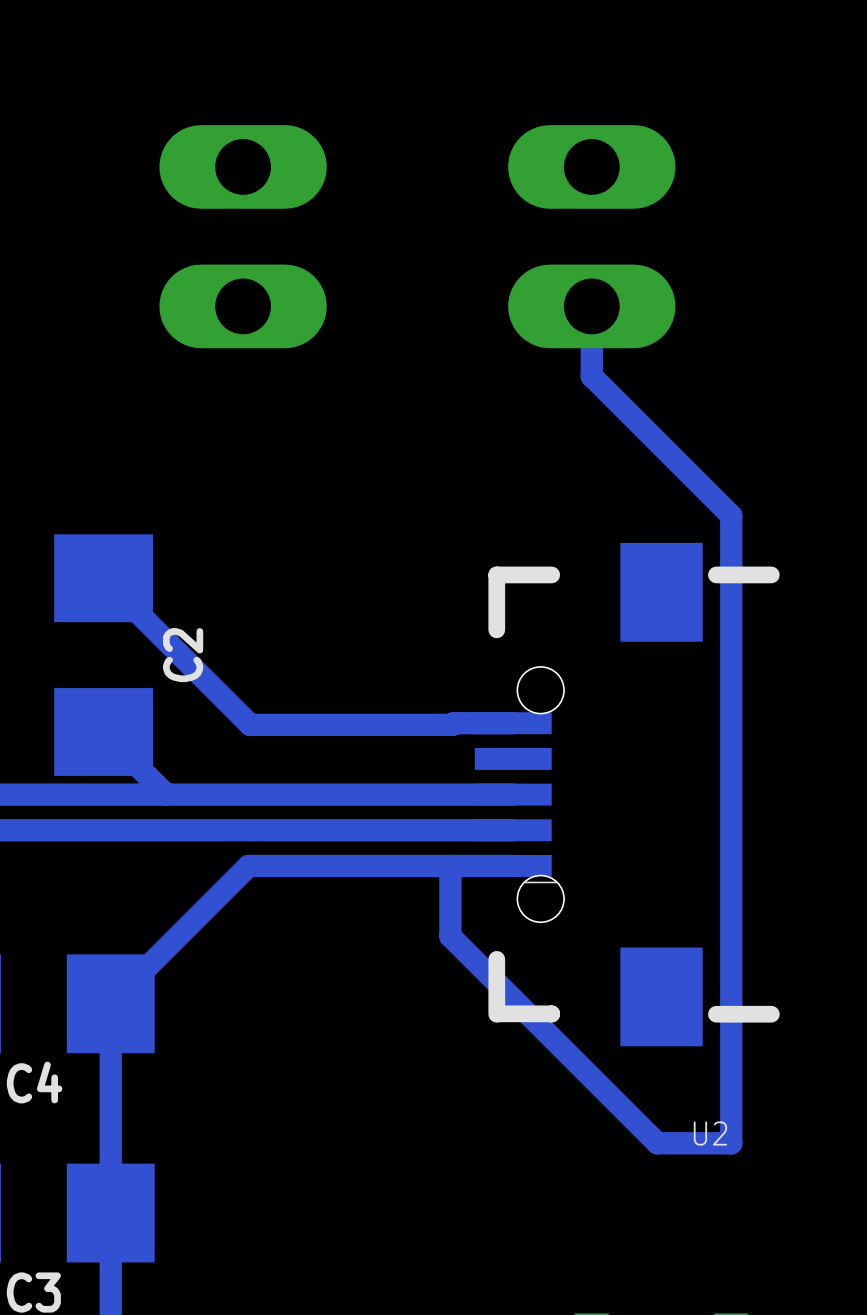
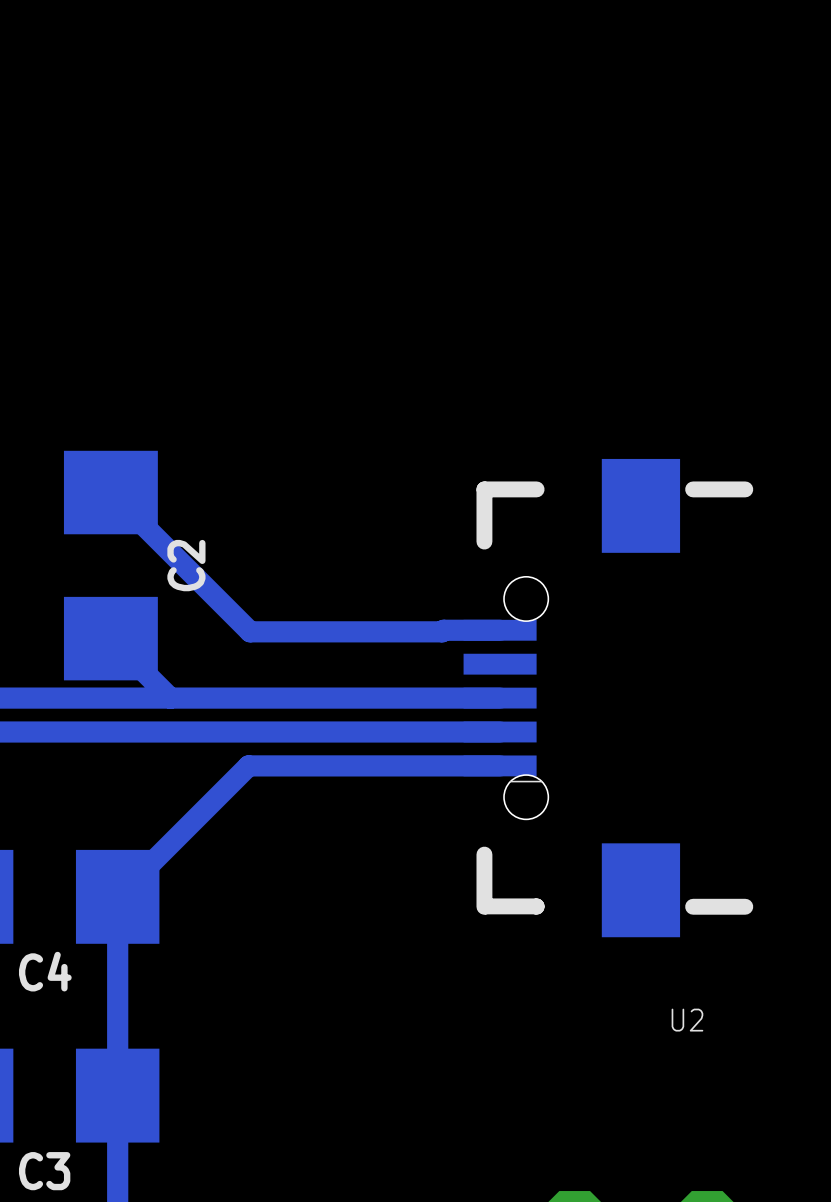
part: (243, 236) -> none
part: (591, 236) -> none
track: (591, 306) (591, 376) (731, 515) (731, 1143) (657, 1143) (450, 936) (450, 865) -> none

